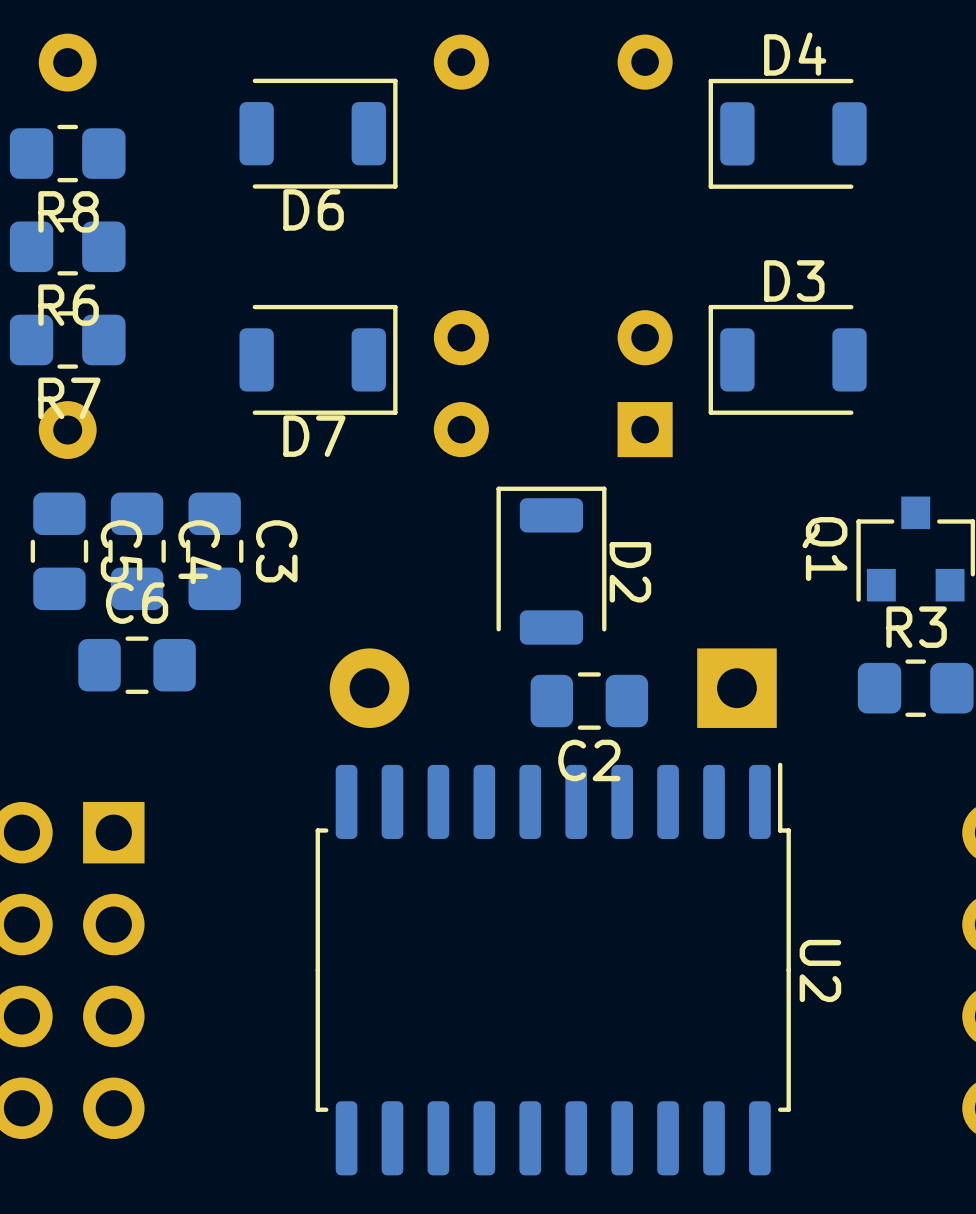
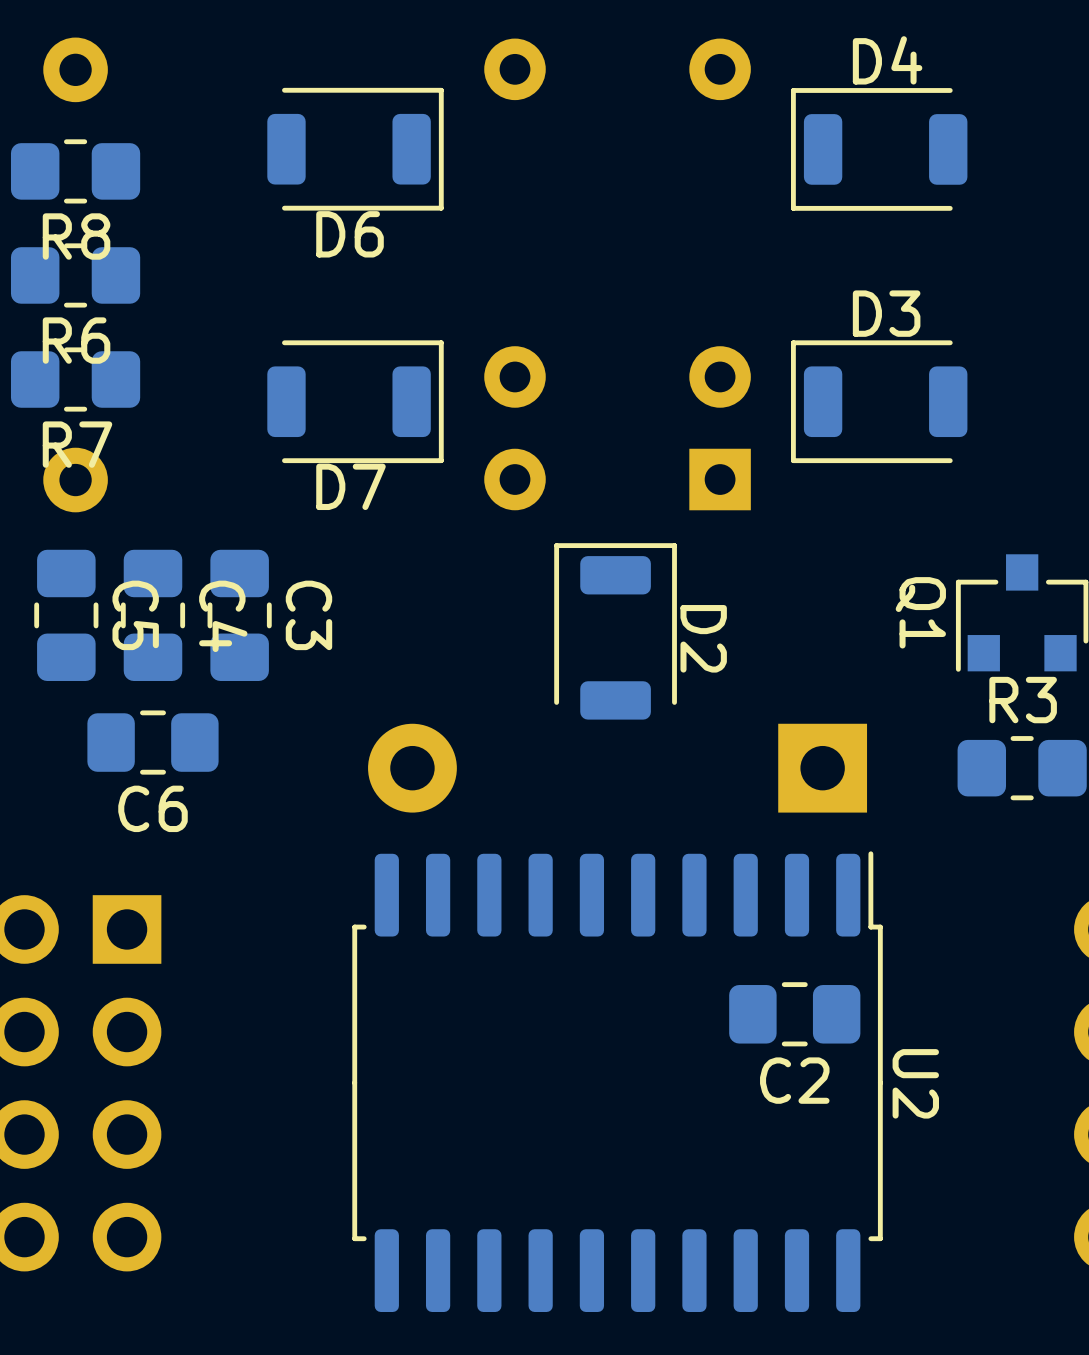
C6 name position: C6 (137, 603) -> C6 (152, 808)
C2 position: (589, 701) -> (794, 1014)

